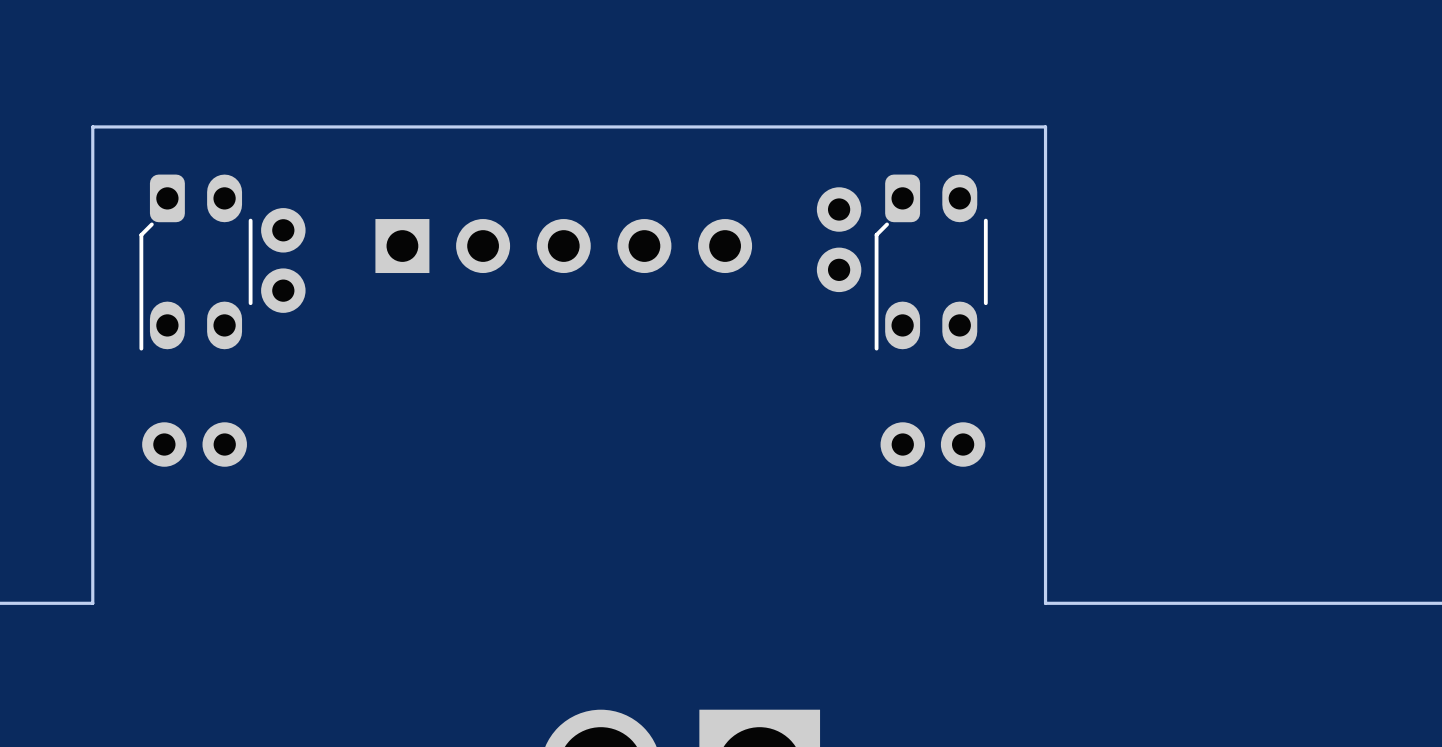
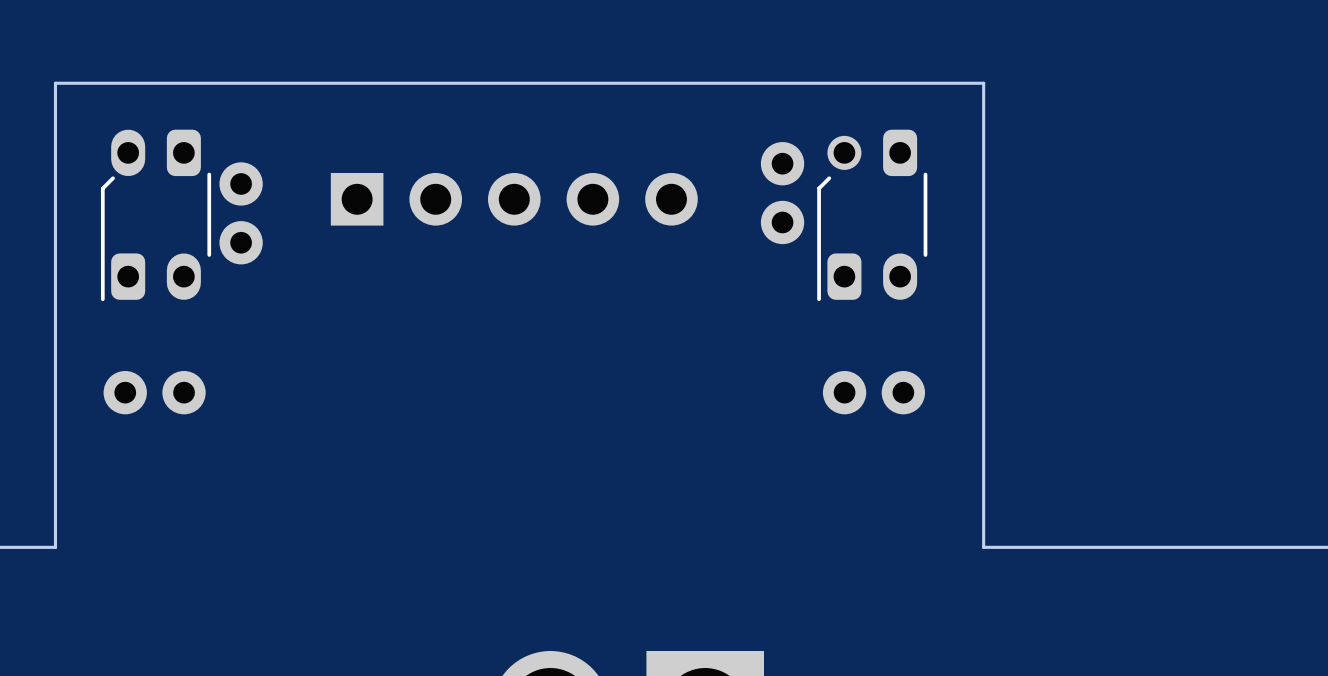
part footprint: [139, 174, 253, 351] -> [100, 129, 212, 302]
part footprint: [874, 174, 988, 351] -> [817, 129, 928, 302]

